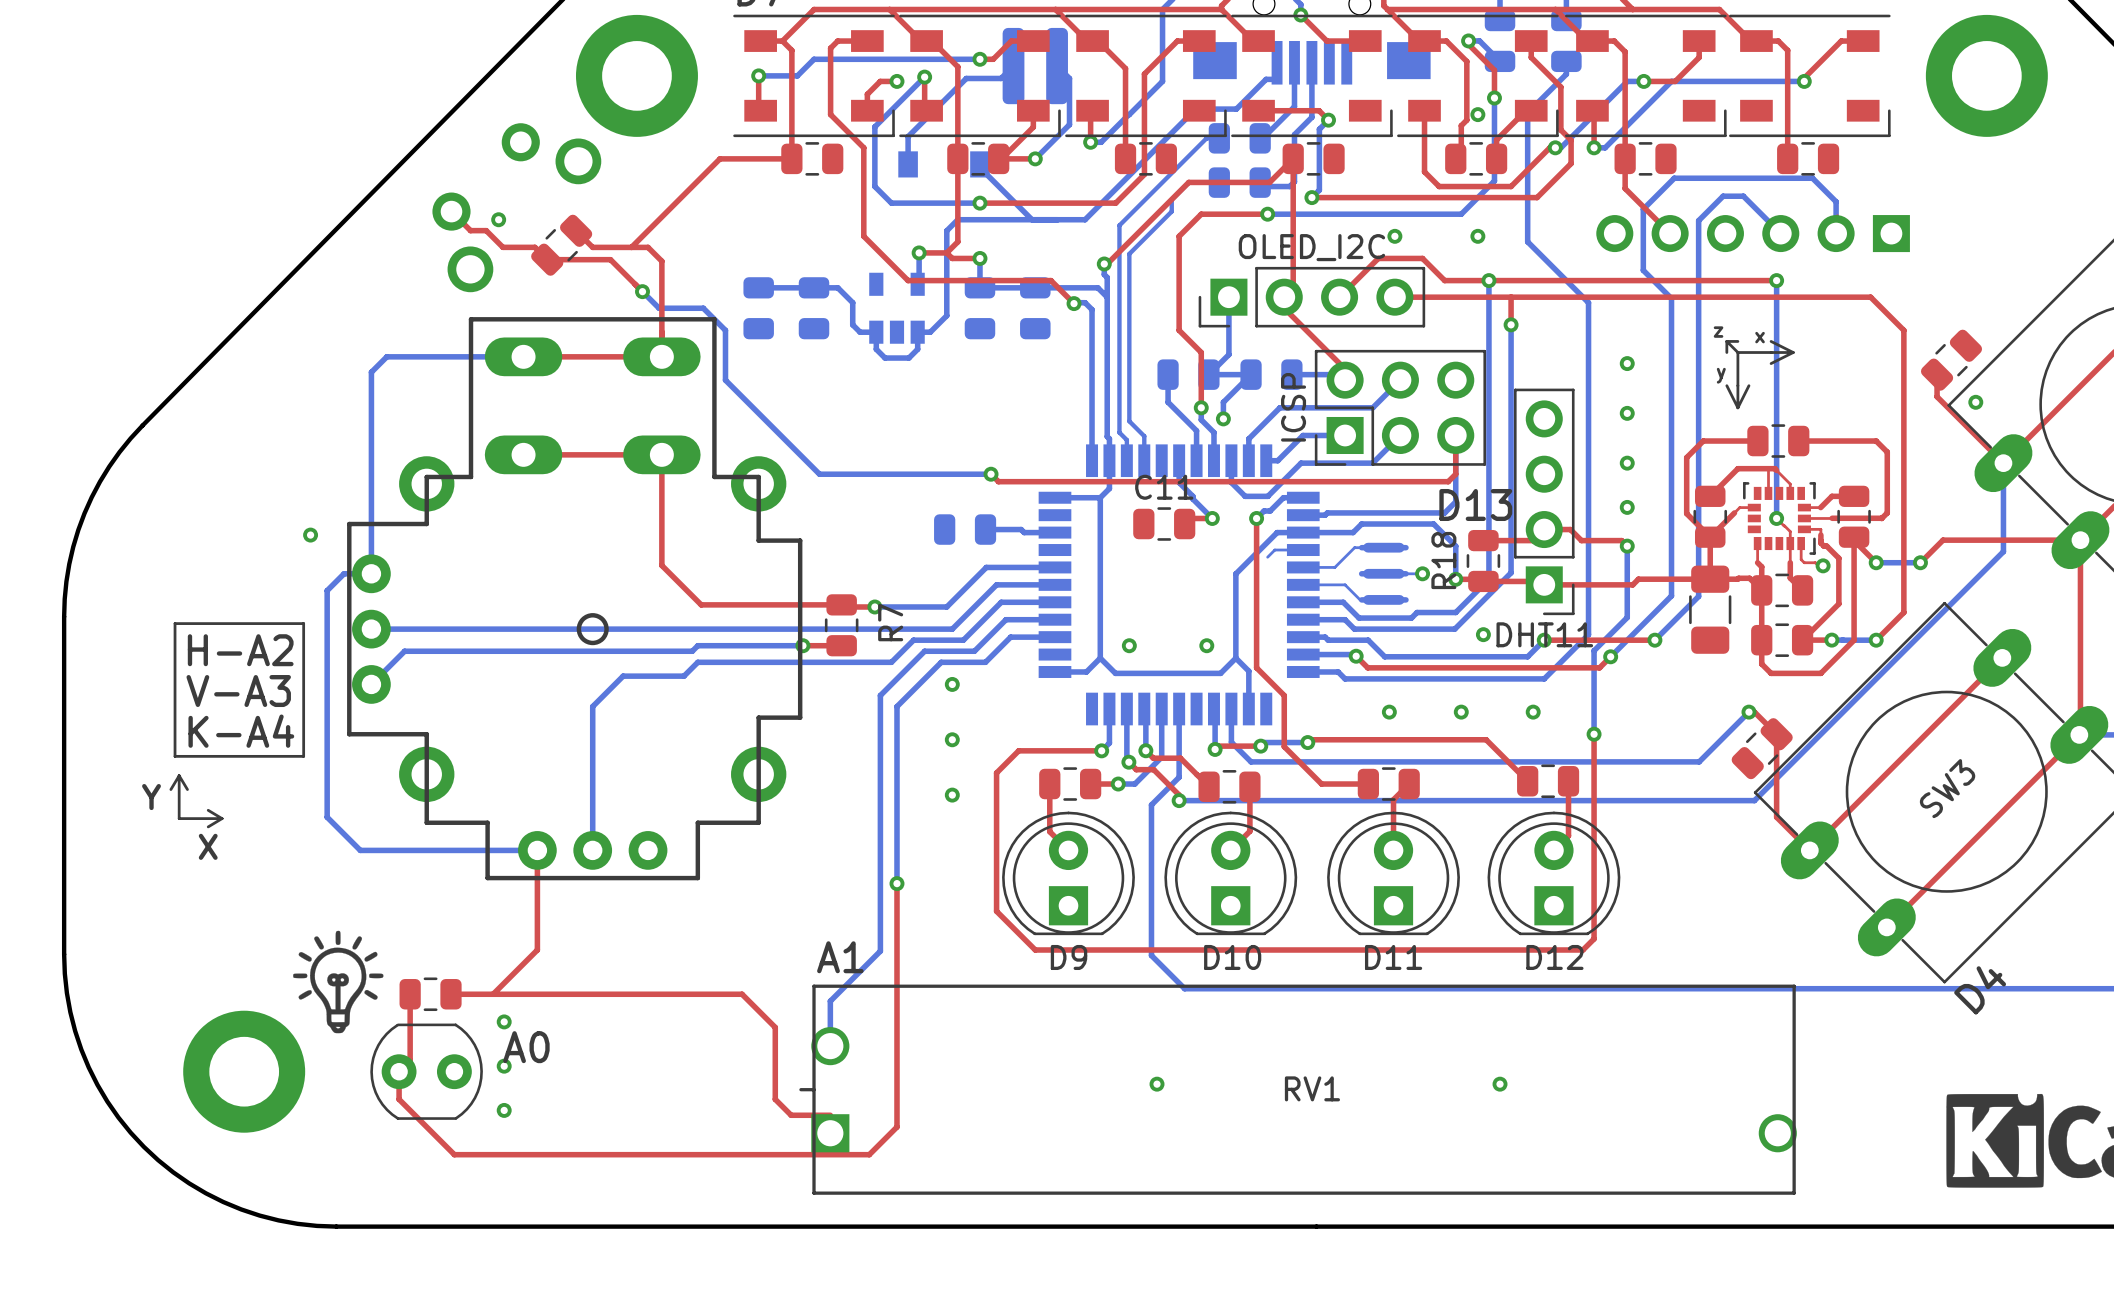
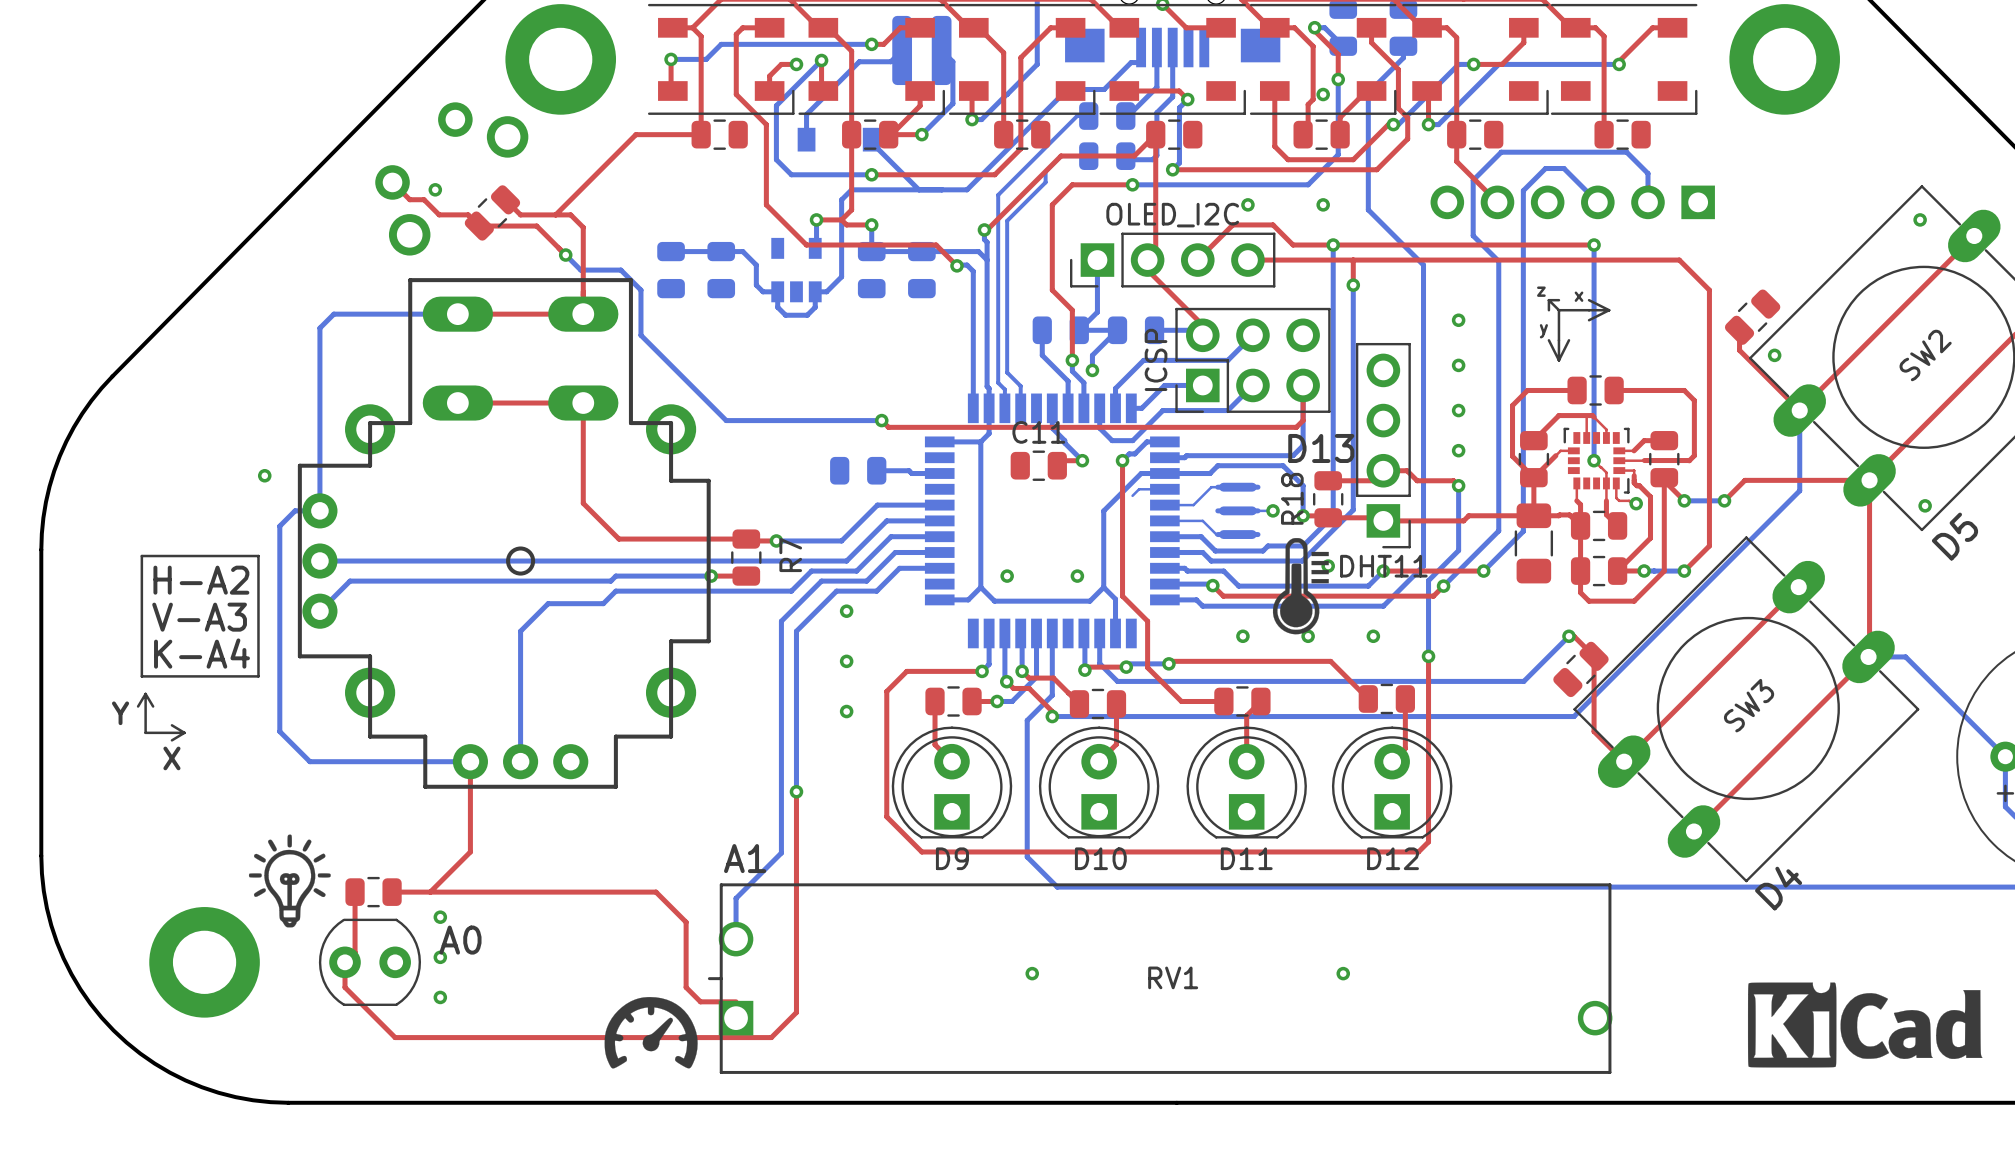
drawing: none -> [1272, 538, 1329, 635]
drawing: none -> [604, 997, 698, 1069]

